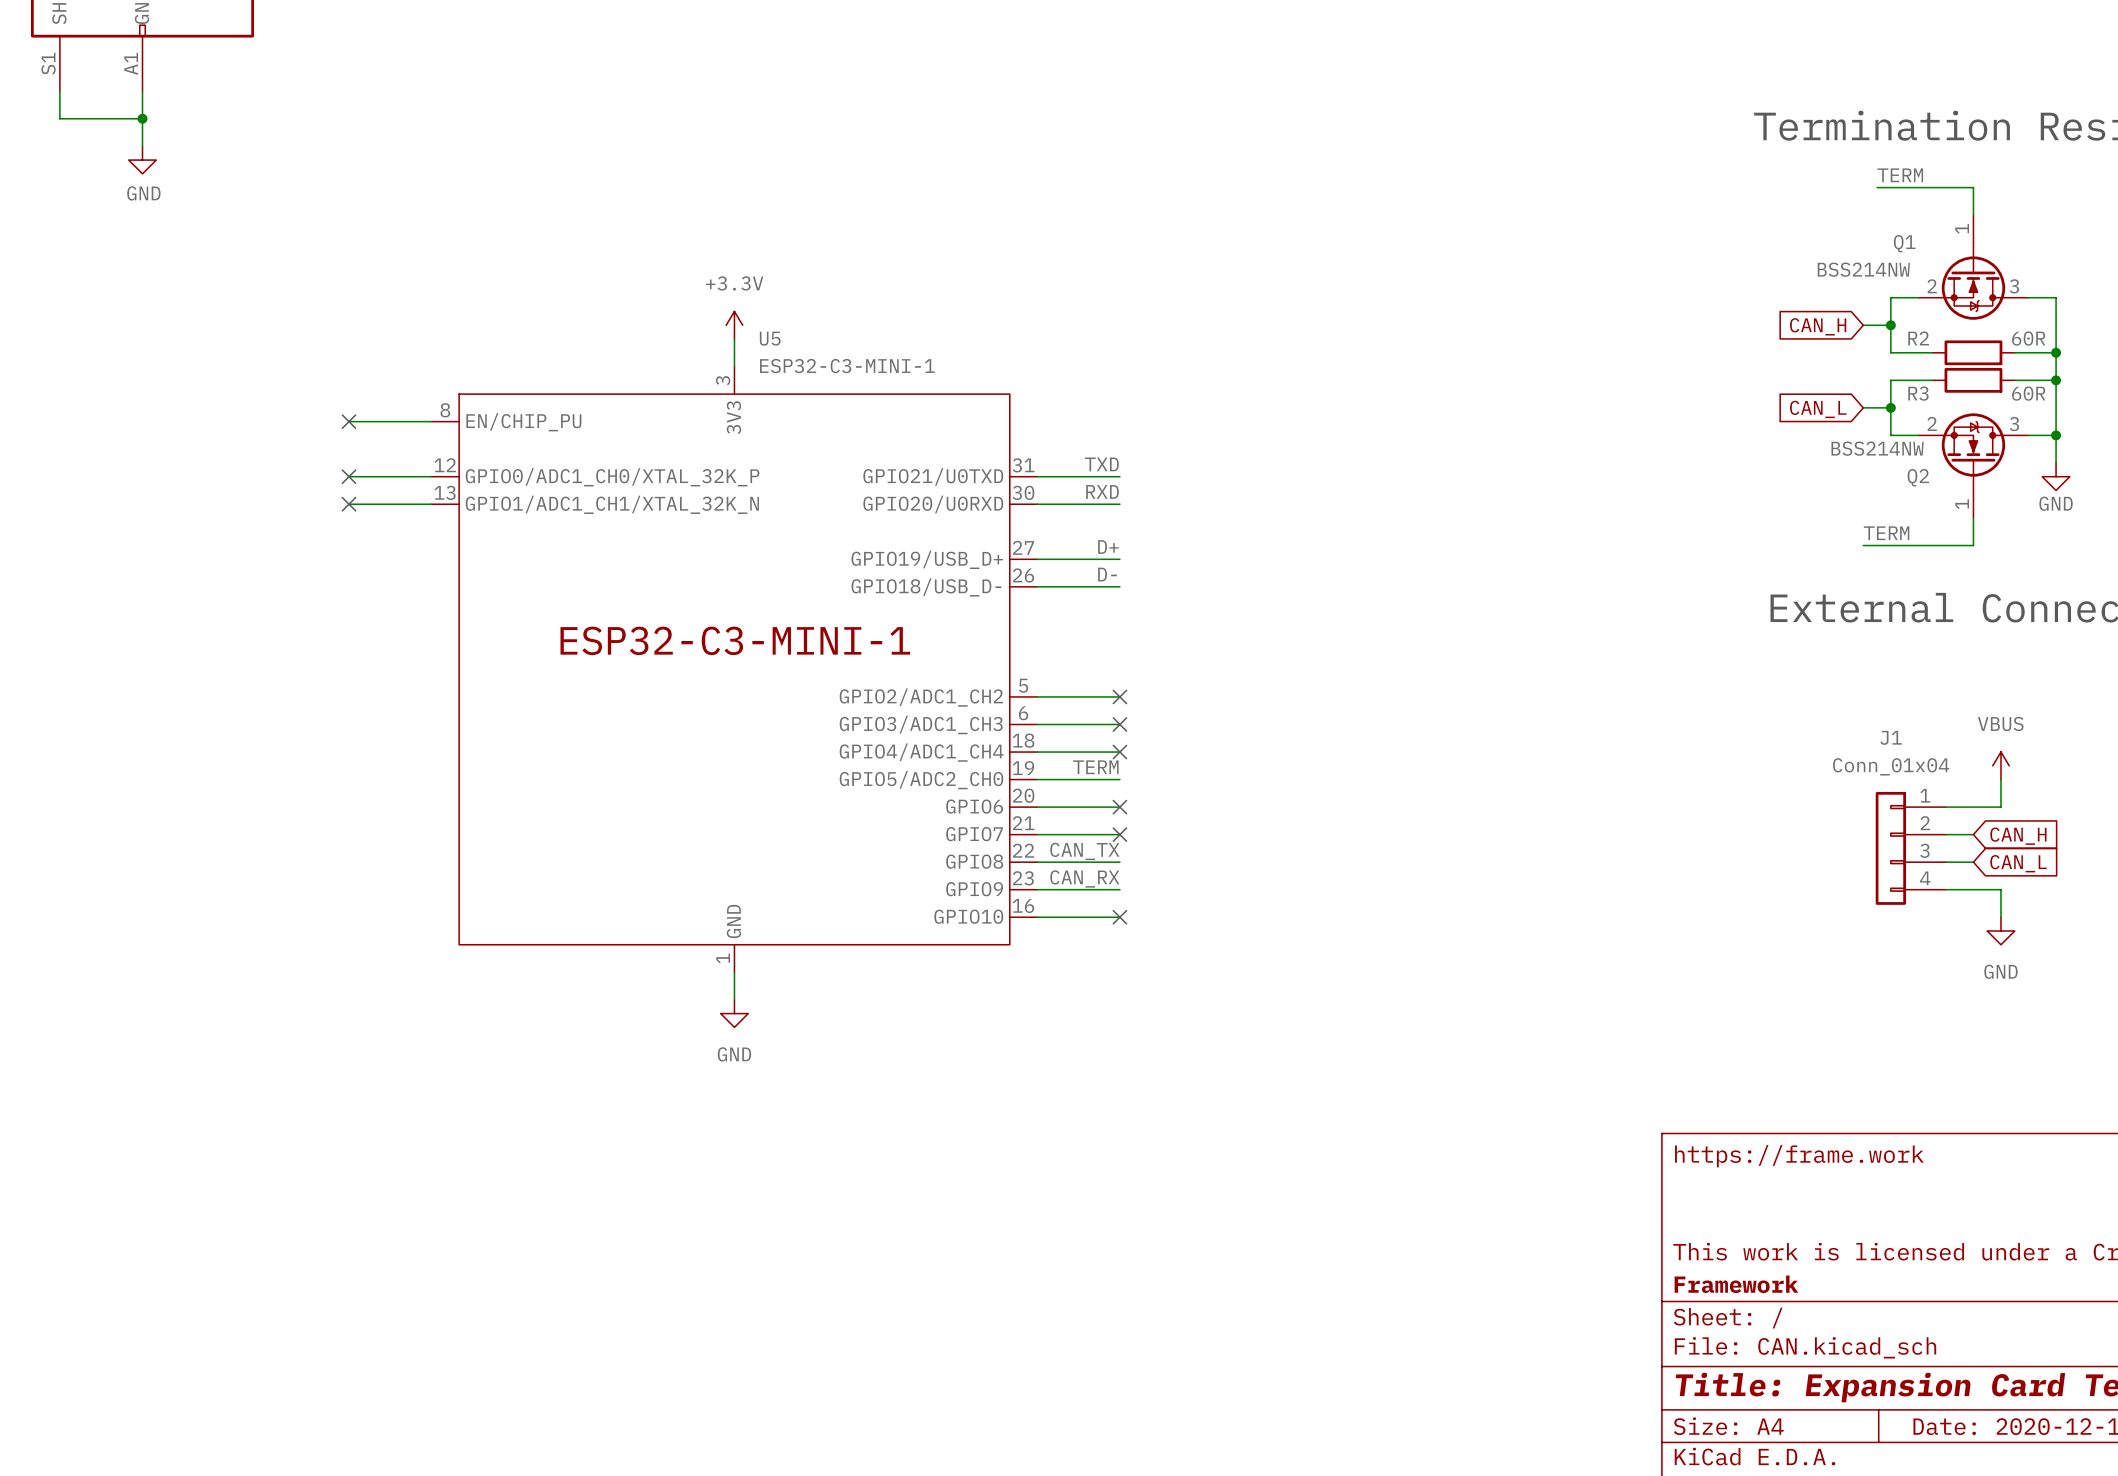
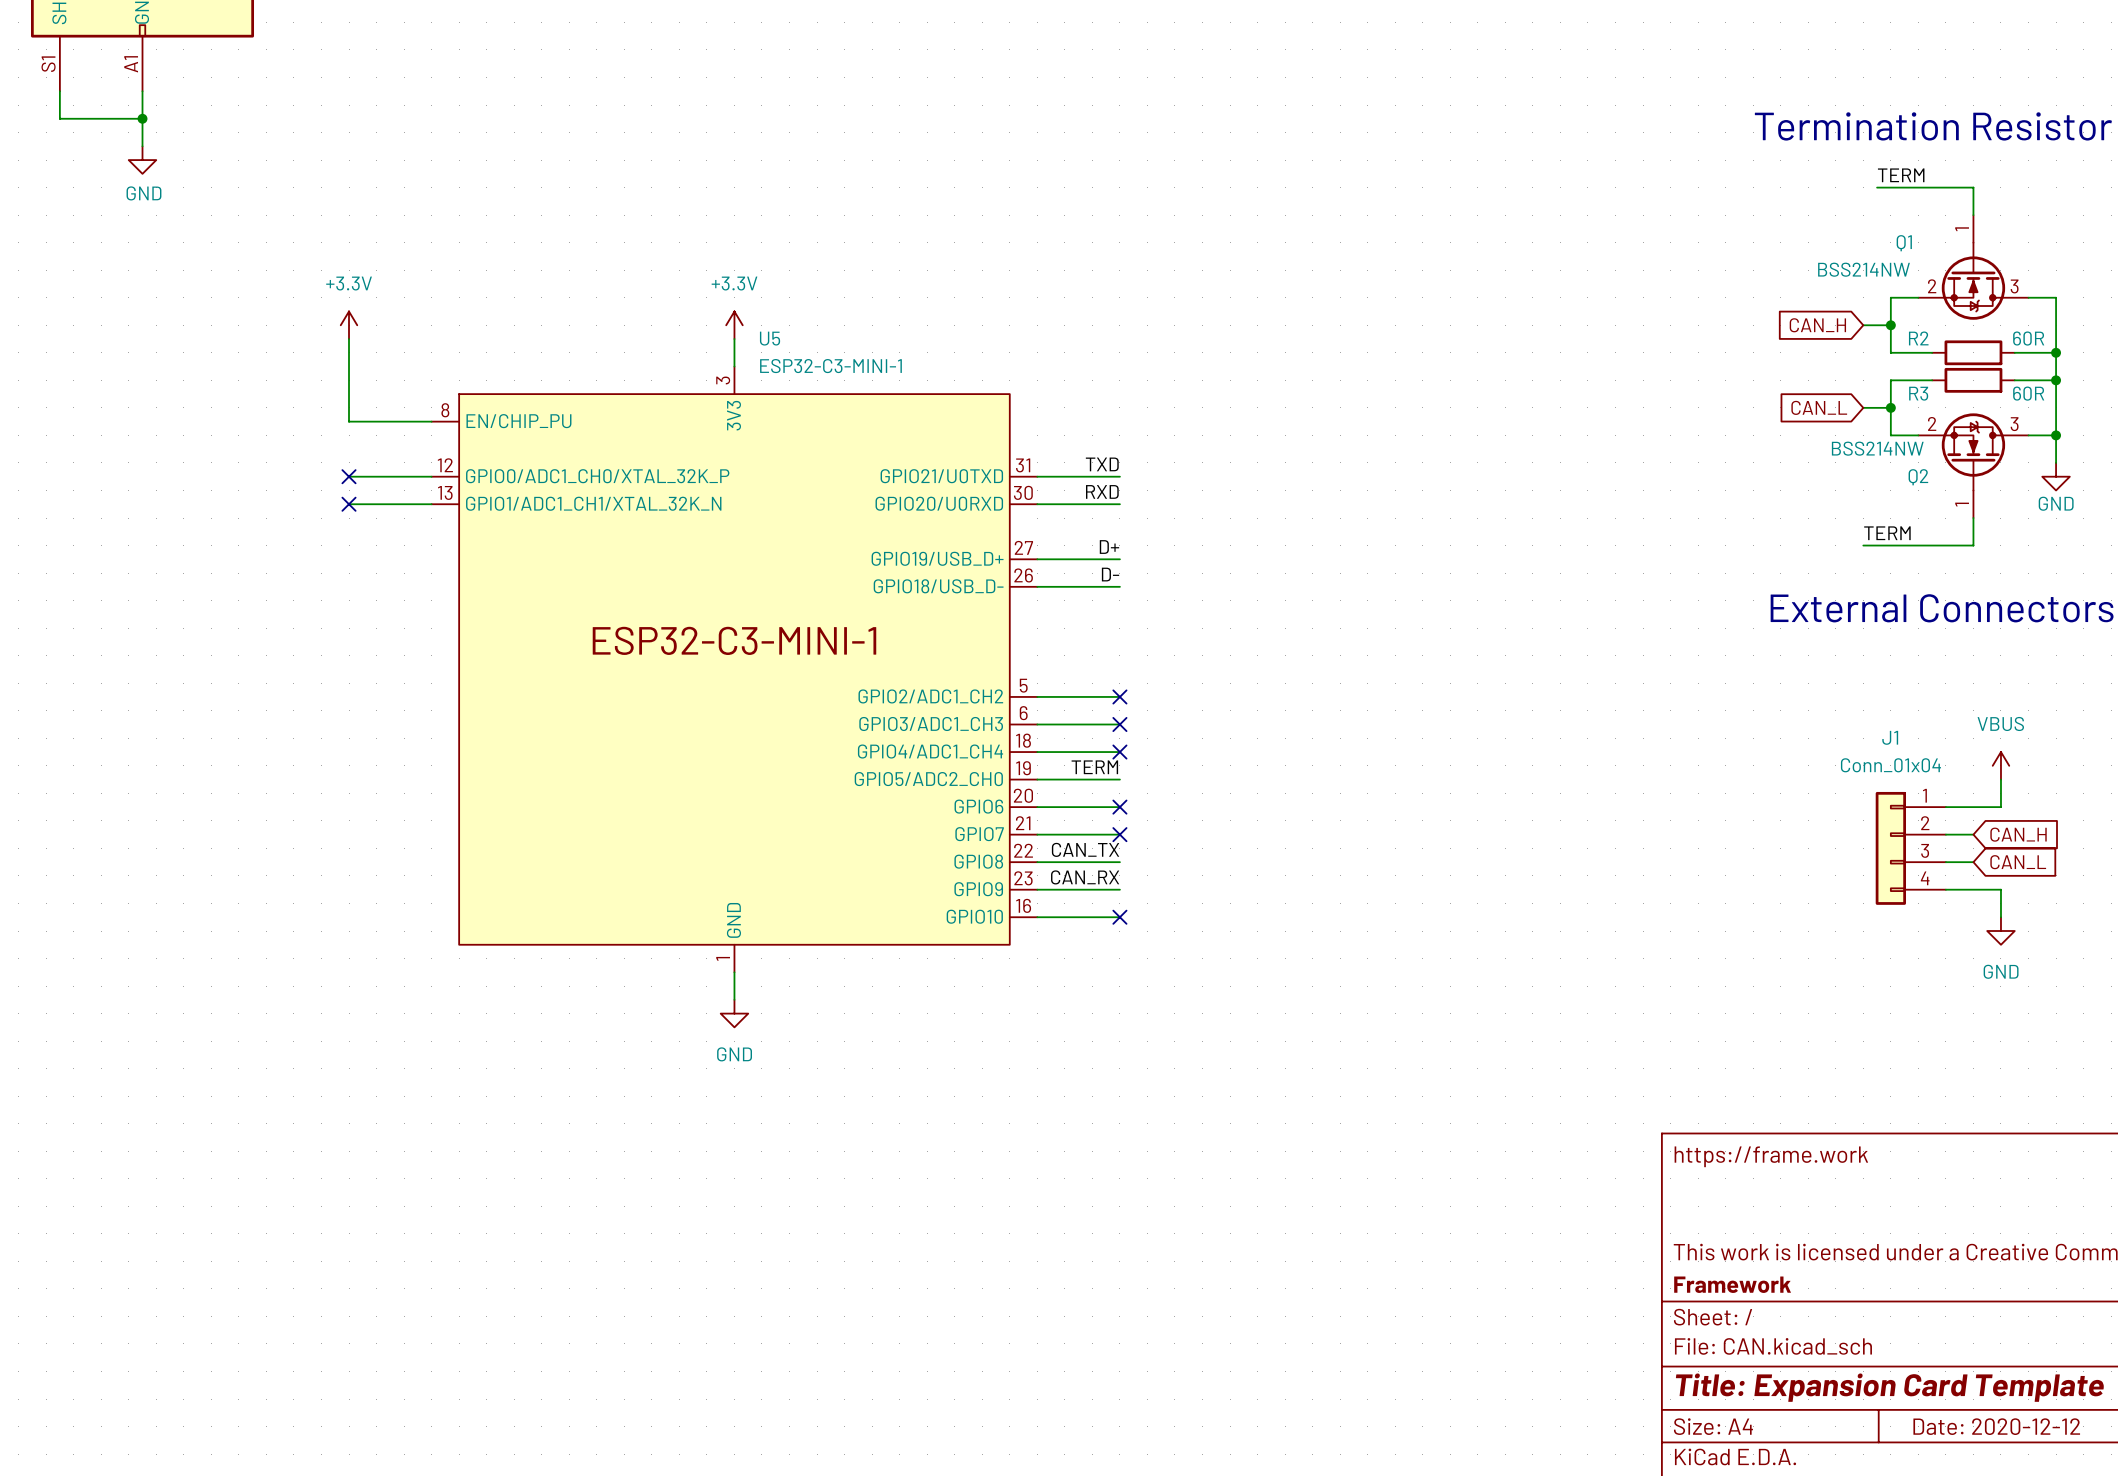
power symbol: none -> +3.3V (349, 325)
wire: none -> (349, 339) (349, 421)
no-connect mark: (349, 421) -> none

